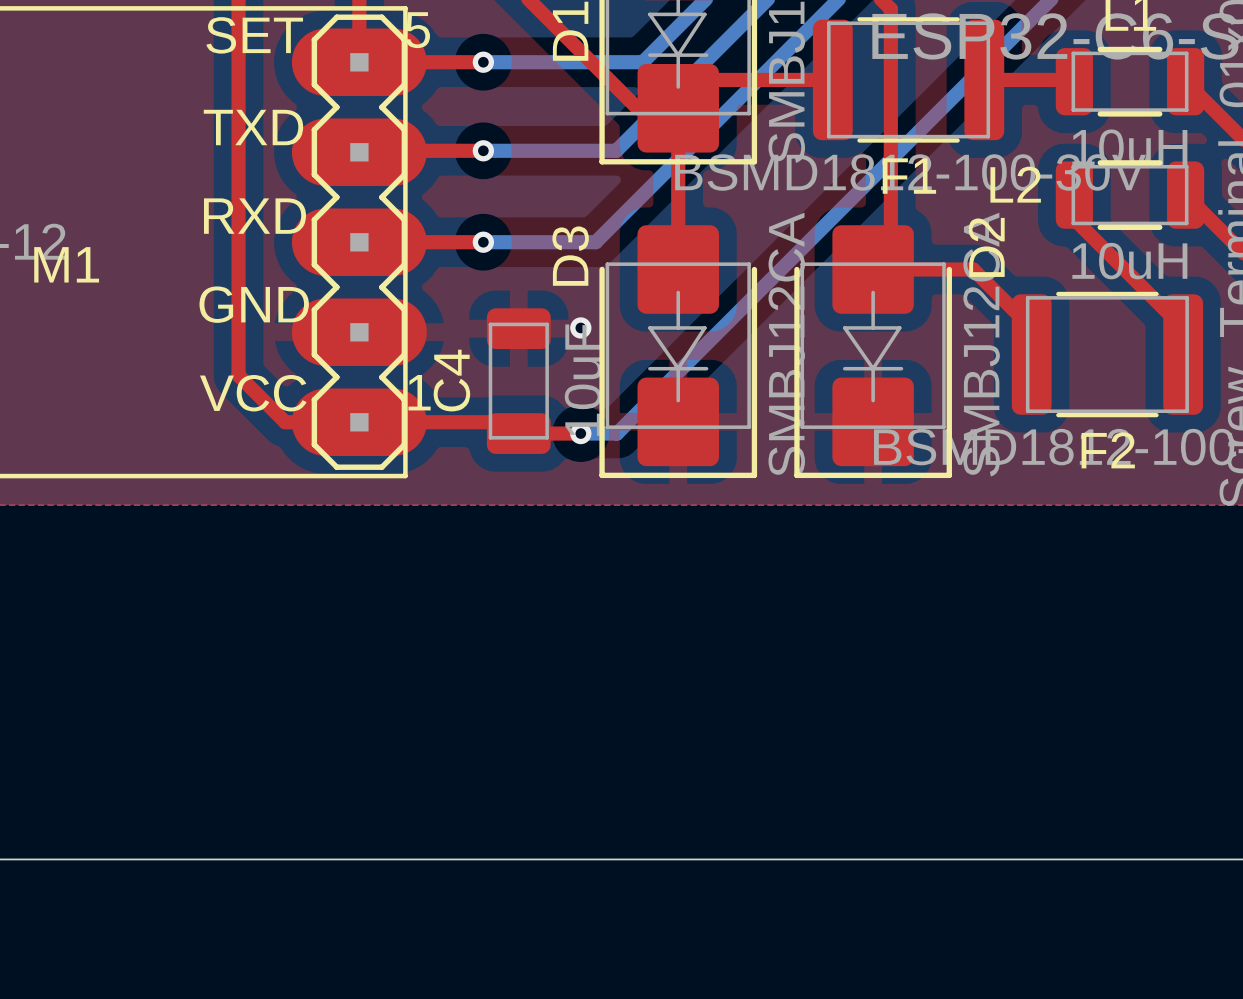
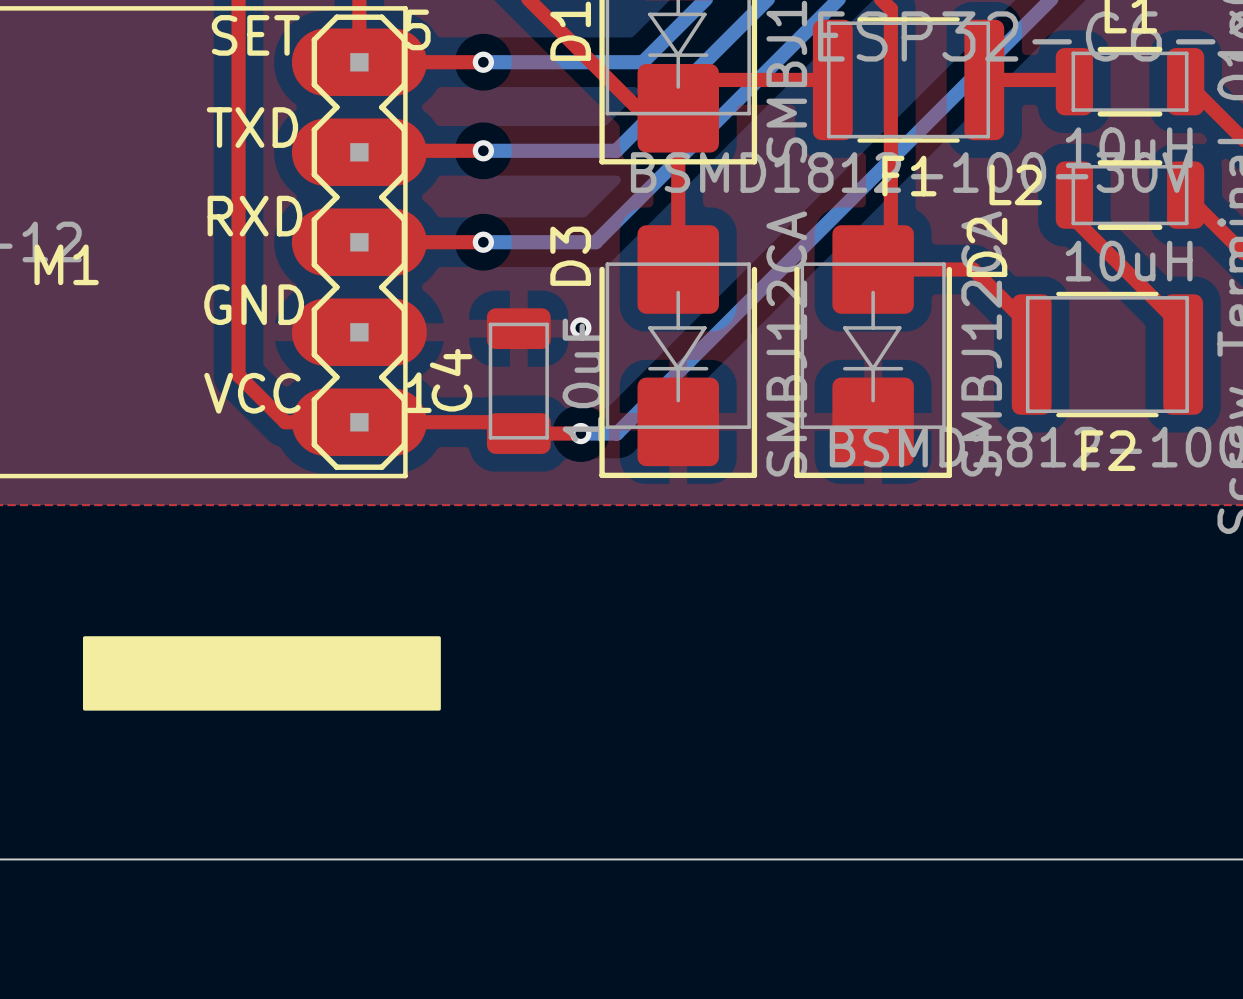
drawing: none -> [82, 636, 441, 711]

